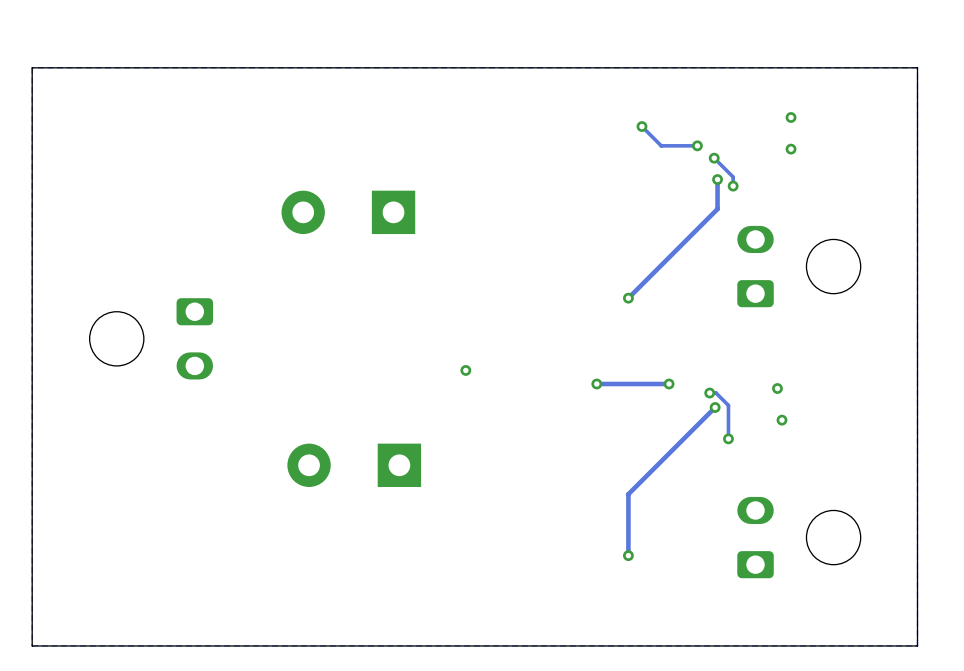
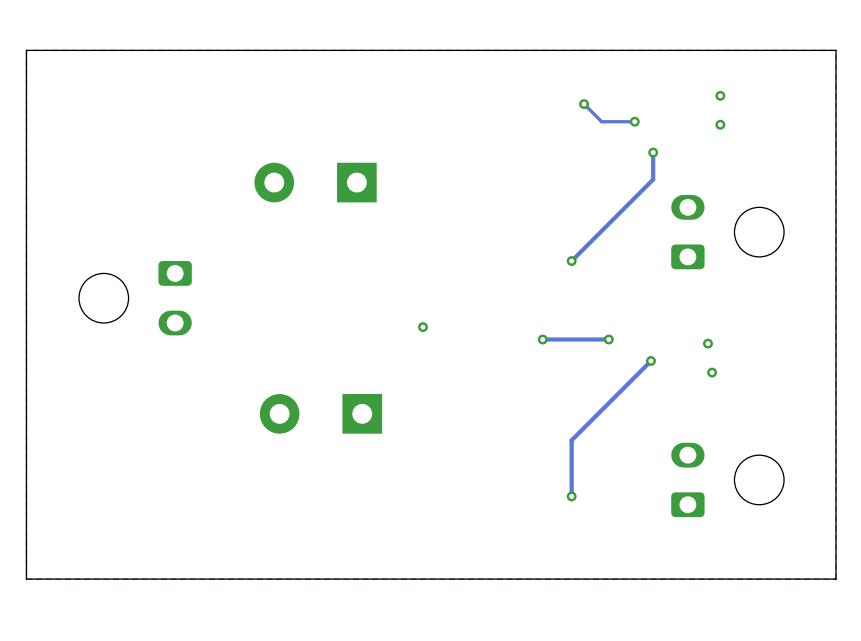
track: (714, 158) (733, 177) (733, 186) -> none
via: (714, 158) -> none
via: (733, 186) -> none
track: (709, 393) (716, 393) (728, 405) (728, 438) -> none
via: (709, 393) -> none
via: (728, 438) -> none

